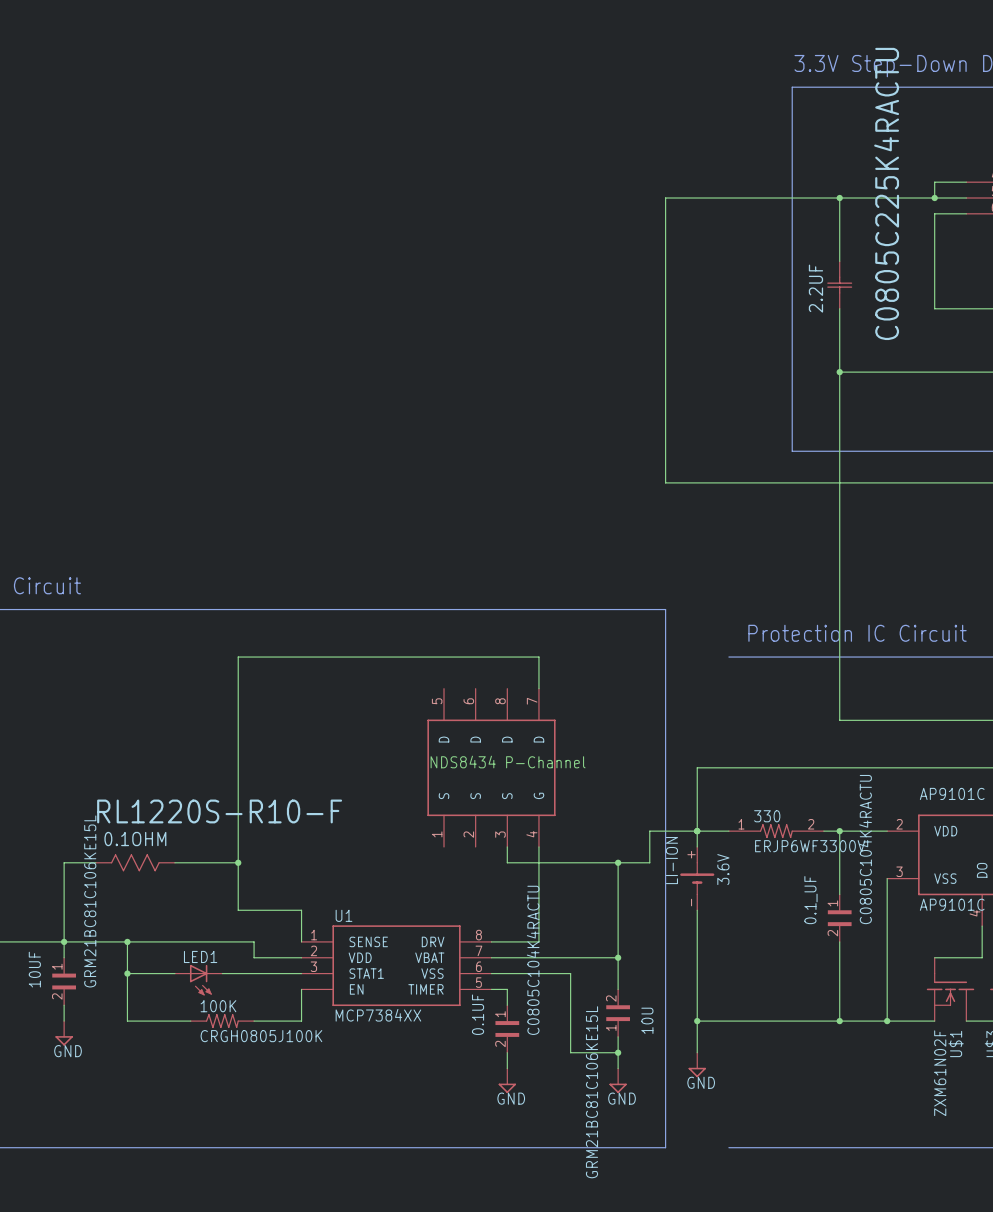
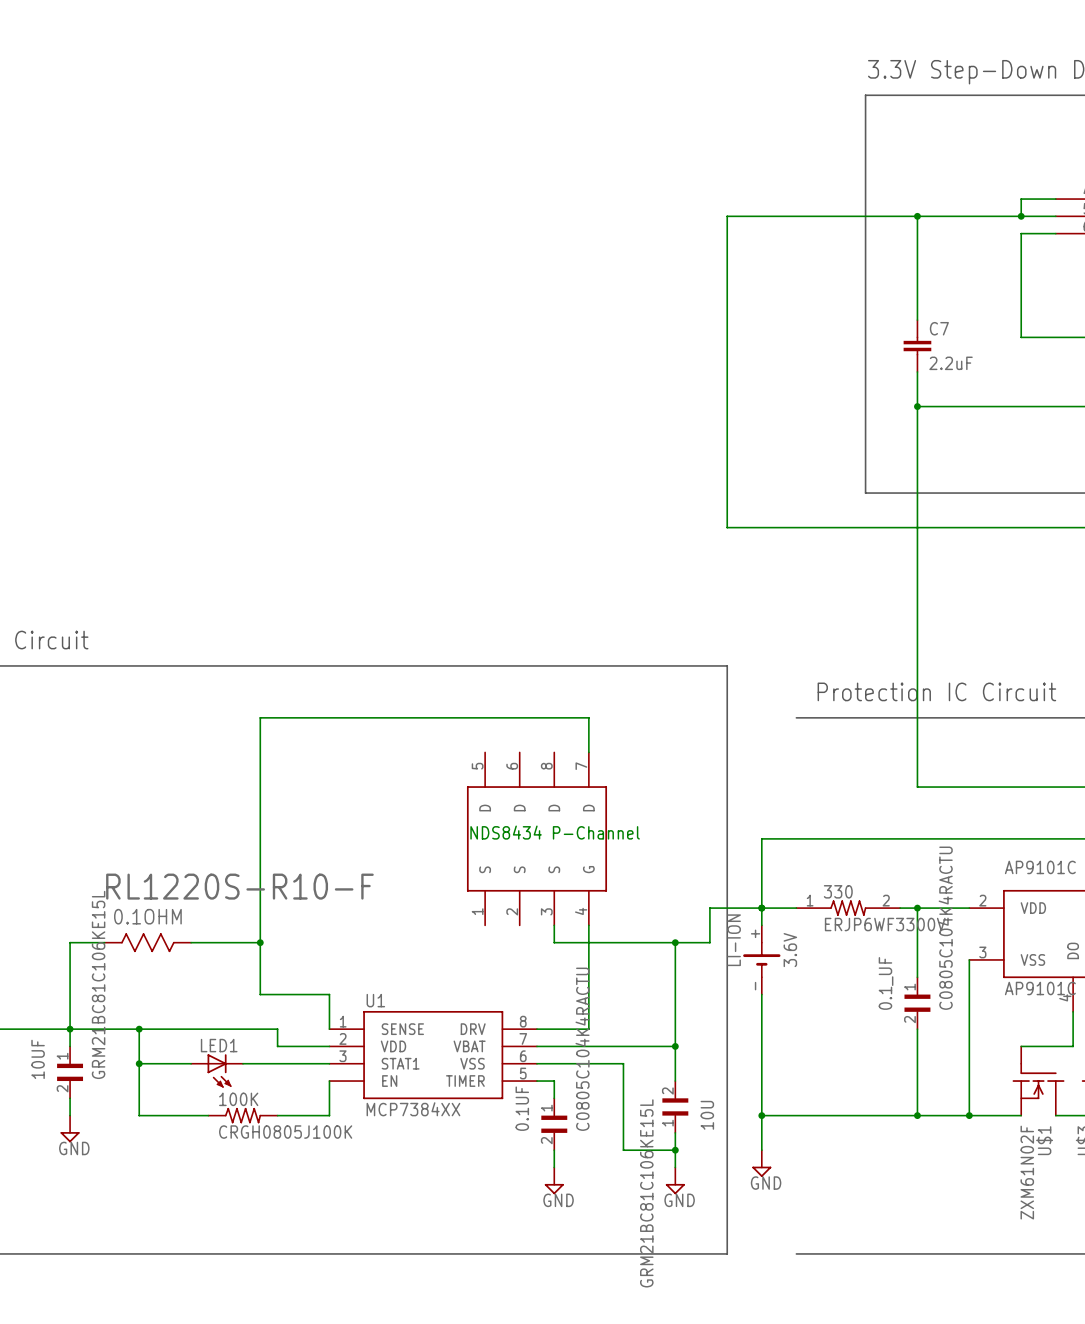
2.2UF: C0805C225K4RACTU (839, 285) -> none
C7: none -> 2.2uF (917, 346)

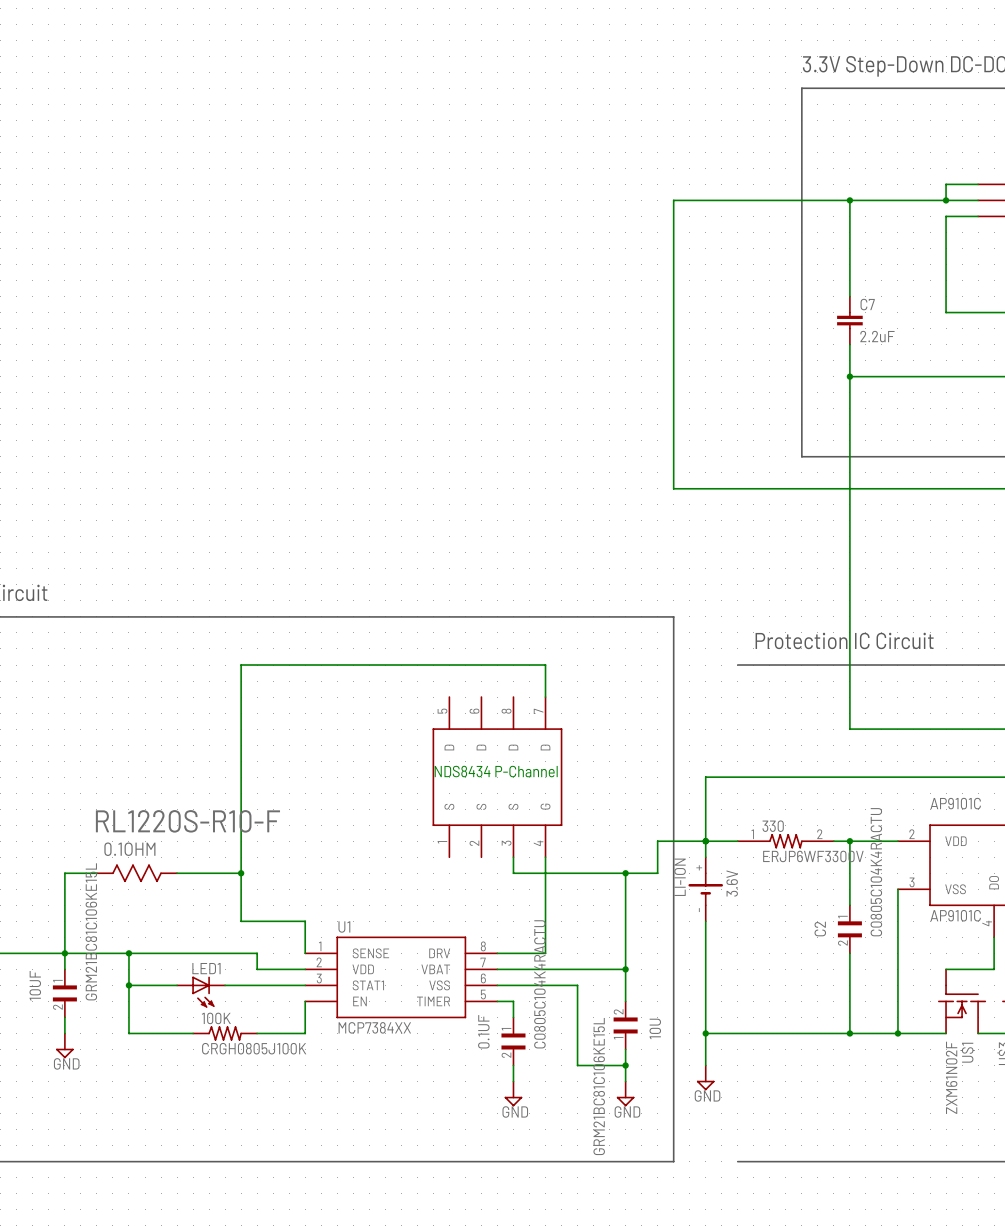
0.1_UF name: 0.1_UF (886, 983) -> C2 (820, 929)

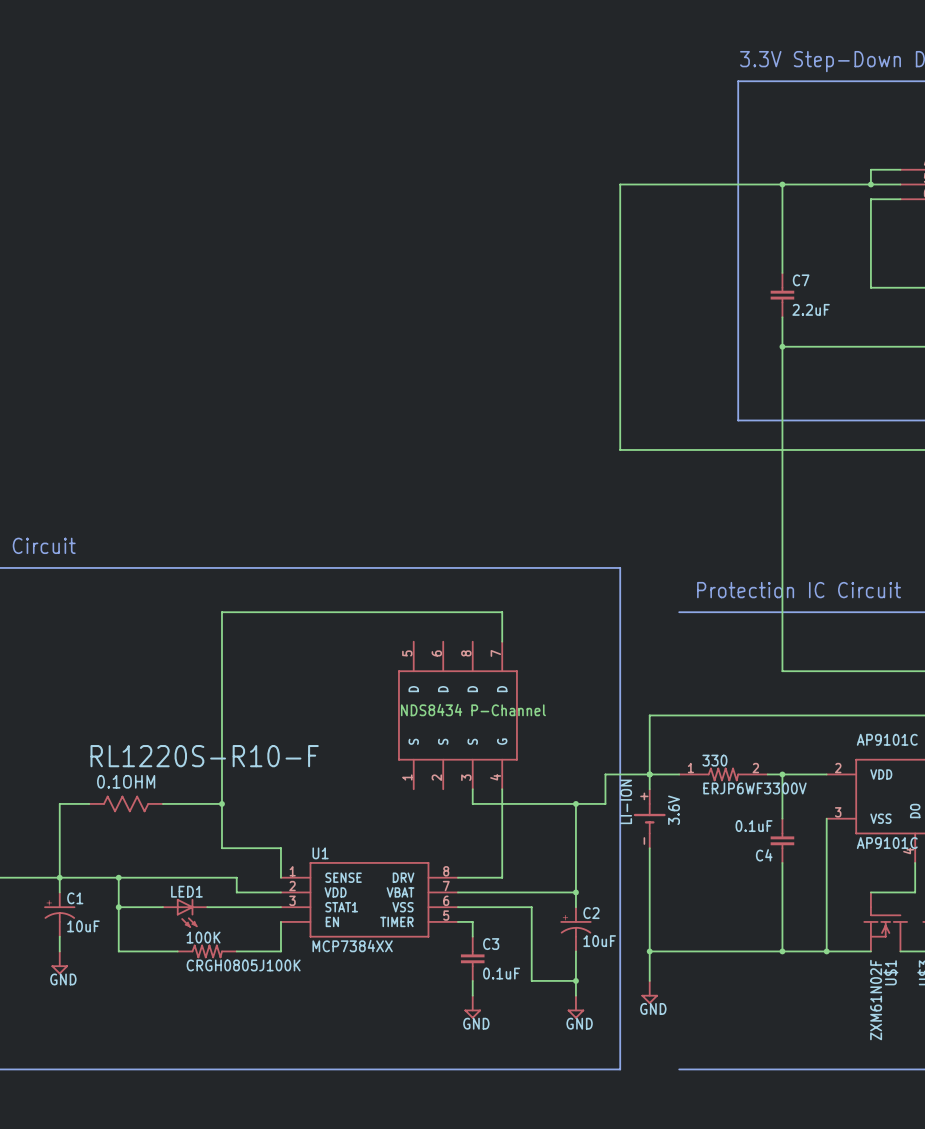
C2 value: C0805C104K4RACTU (876, 872) -> 10uF (599, 941)
C2 symbol: [837, 905, 862, 954] -> [560, 907, 592, 952]
C4: none -> 0.1uF (782, 840)
C2 name position: C2 (820, 929) -> C2 (591, 913)
10UF: GRM21BC81C106KE15L (64, 993) -> none
C1: none -> 10uF (59, 914)
10U: GRM21BC81C106KE15L (625, 1025) -> none
0.1UF: C0805C104K4RACTU (513, 1041) -> none
C3: none -> 0.1uF (472, 958)

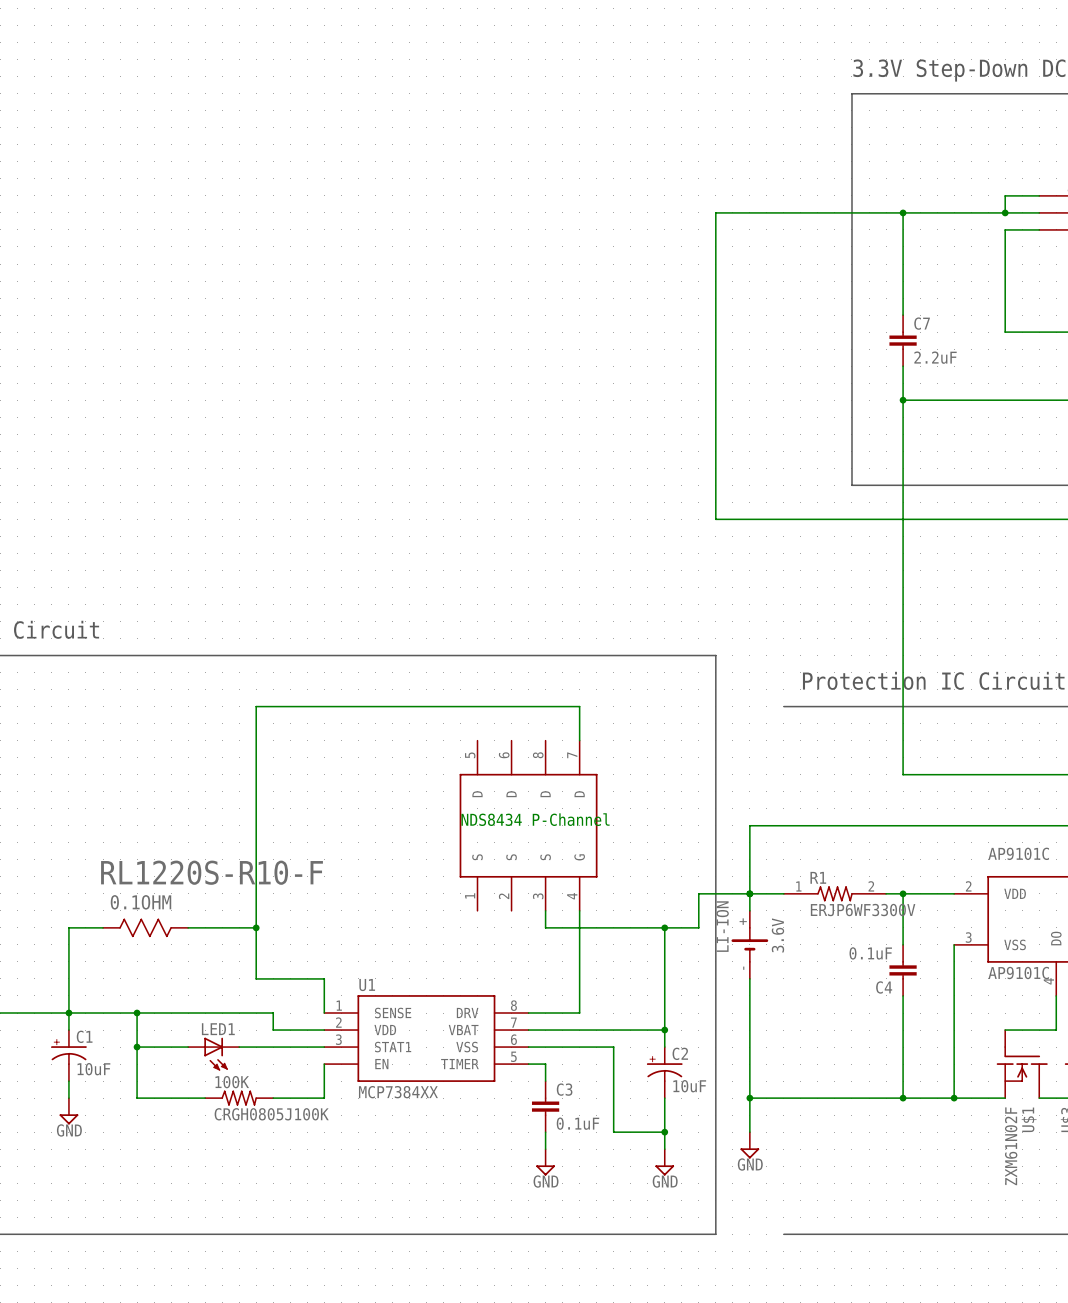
330 name: 330 (714, 760) -> R1 (818, 877)

